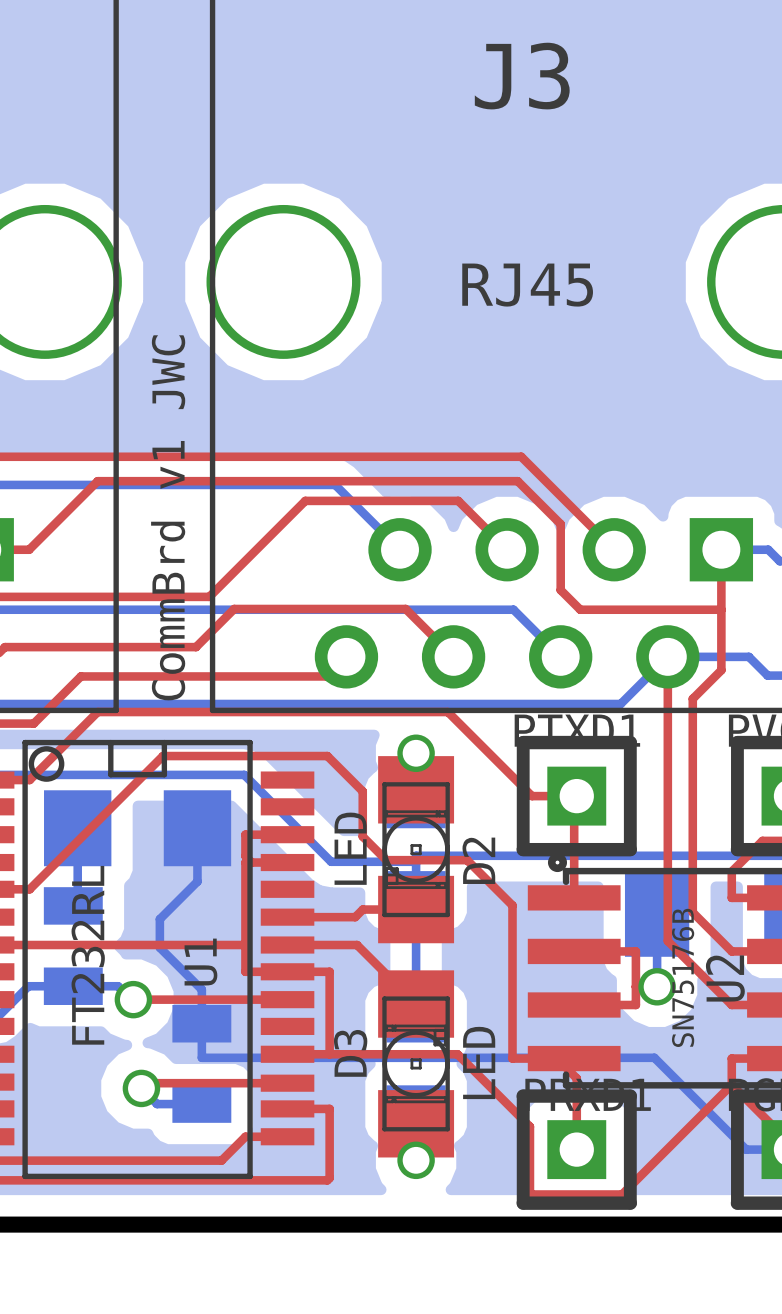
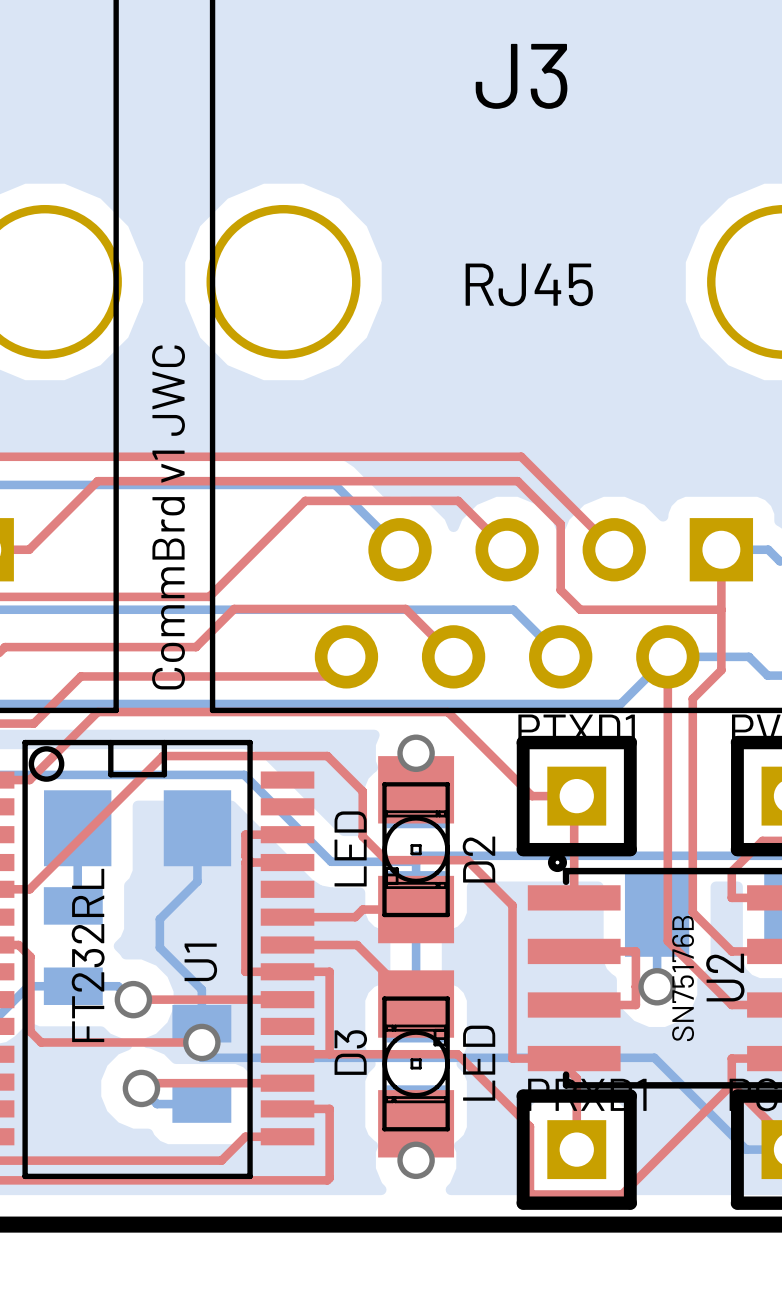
top track: (18, 945) (245, 945) -> (18, 945) (30, 956) (30, 1031) (41, 1042) (201, 1042)
via: none -> (201, 1042)

